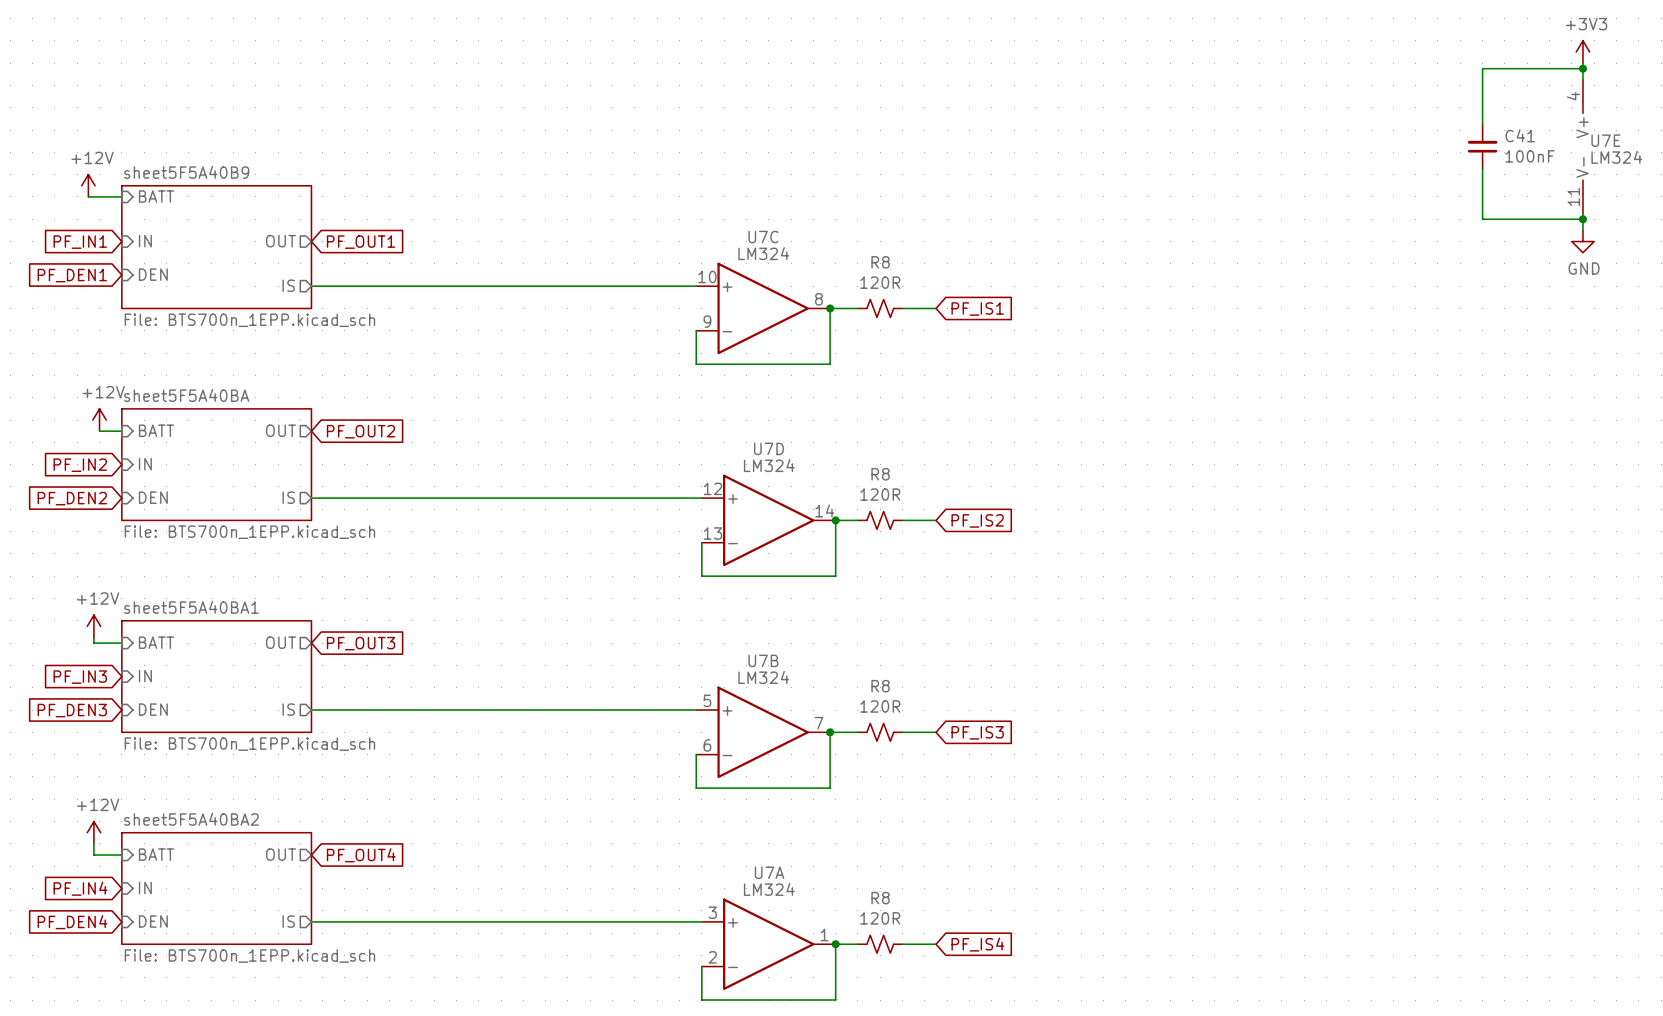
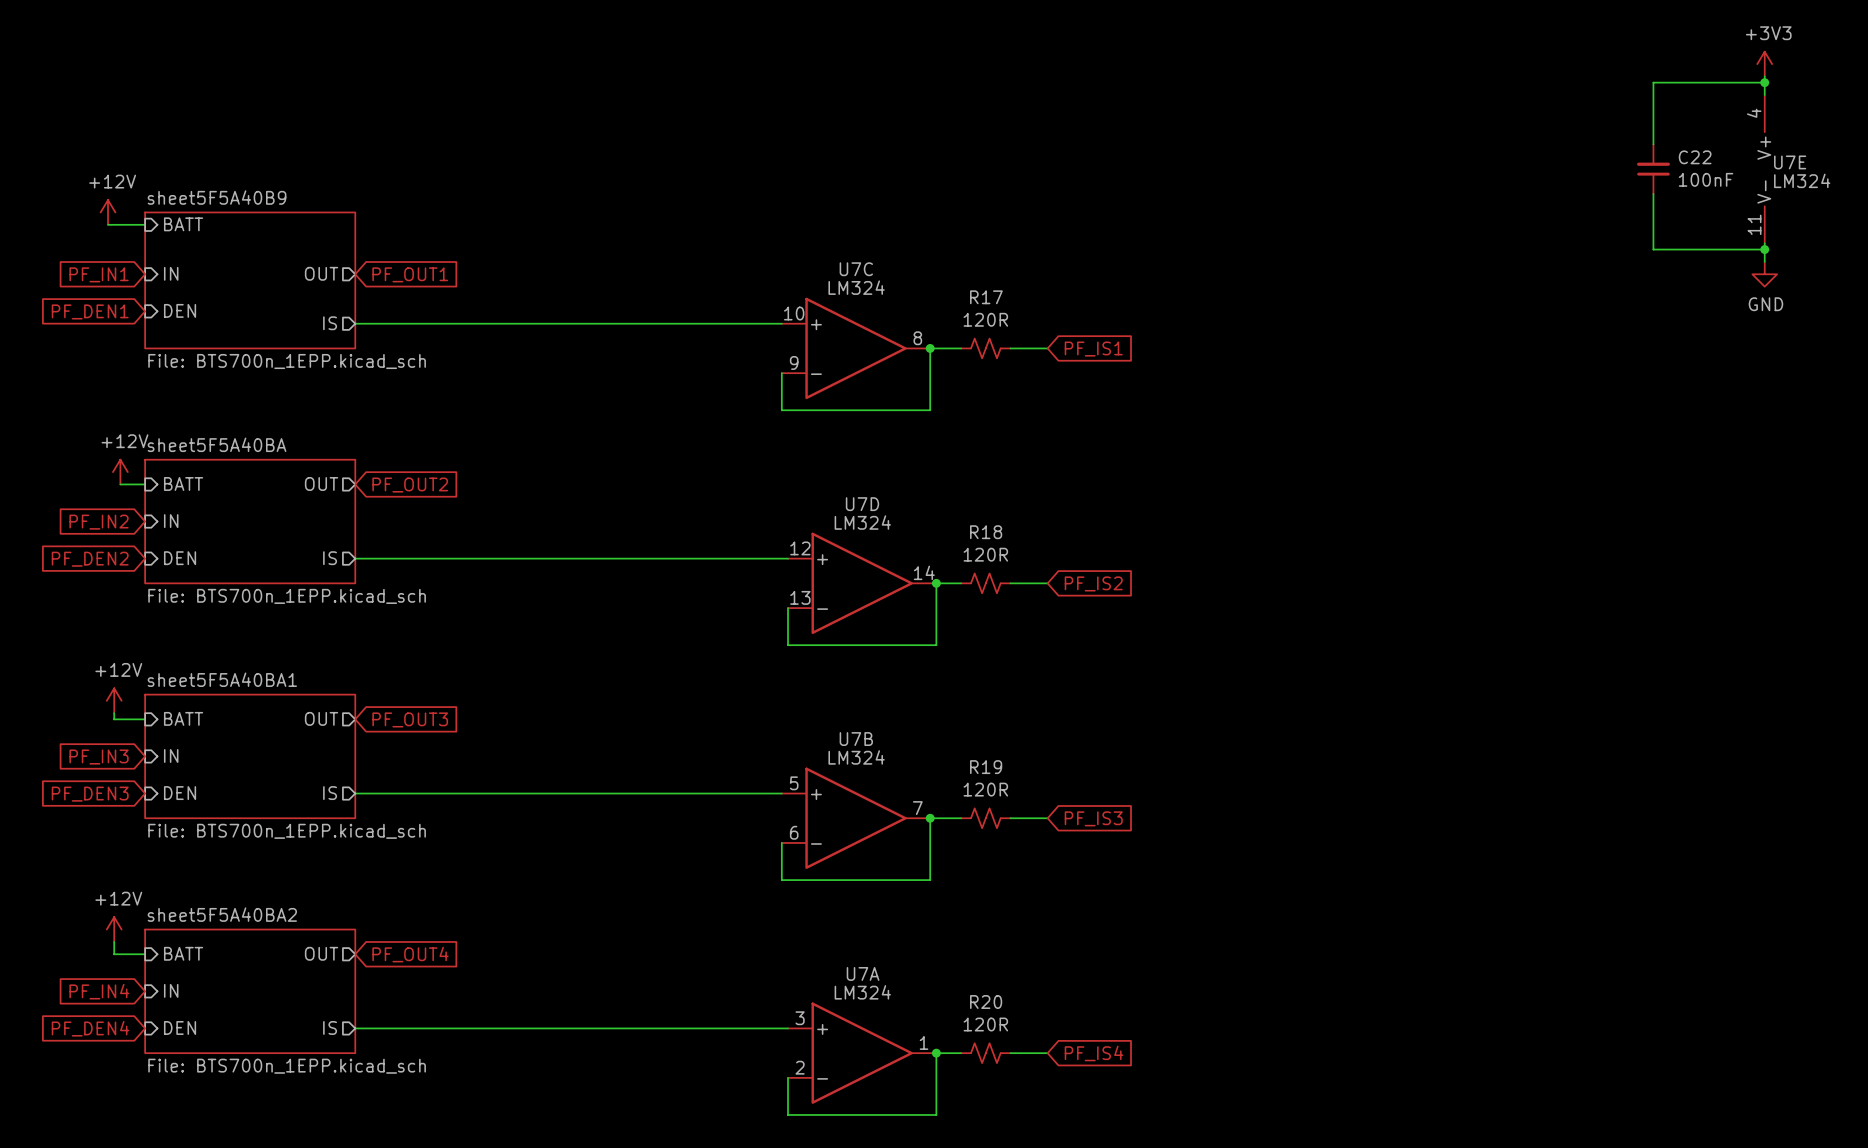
C41 name: C41 (1520, 135) -> C22 (1695, 157)
R8 name: R8 (880, 262) -> R17 (986, 297)
R8 name: R8 (880, 474) -> R18 (986, 532)
R8 name: R8 (880, 686) -> R19 (986, 767)
R8 name: R8 (880, 898) -> R20 (986, 1002)

